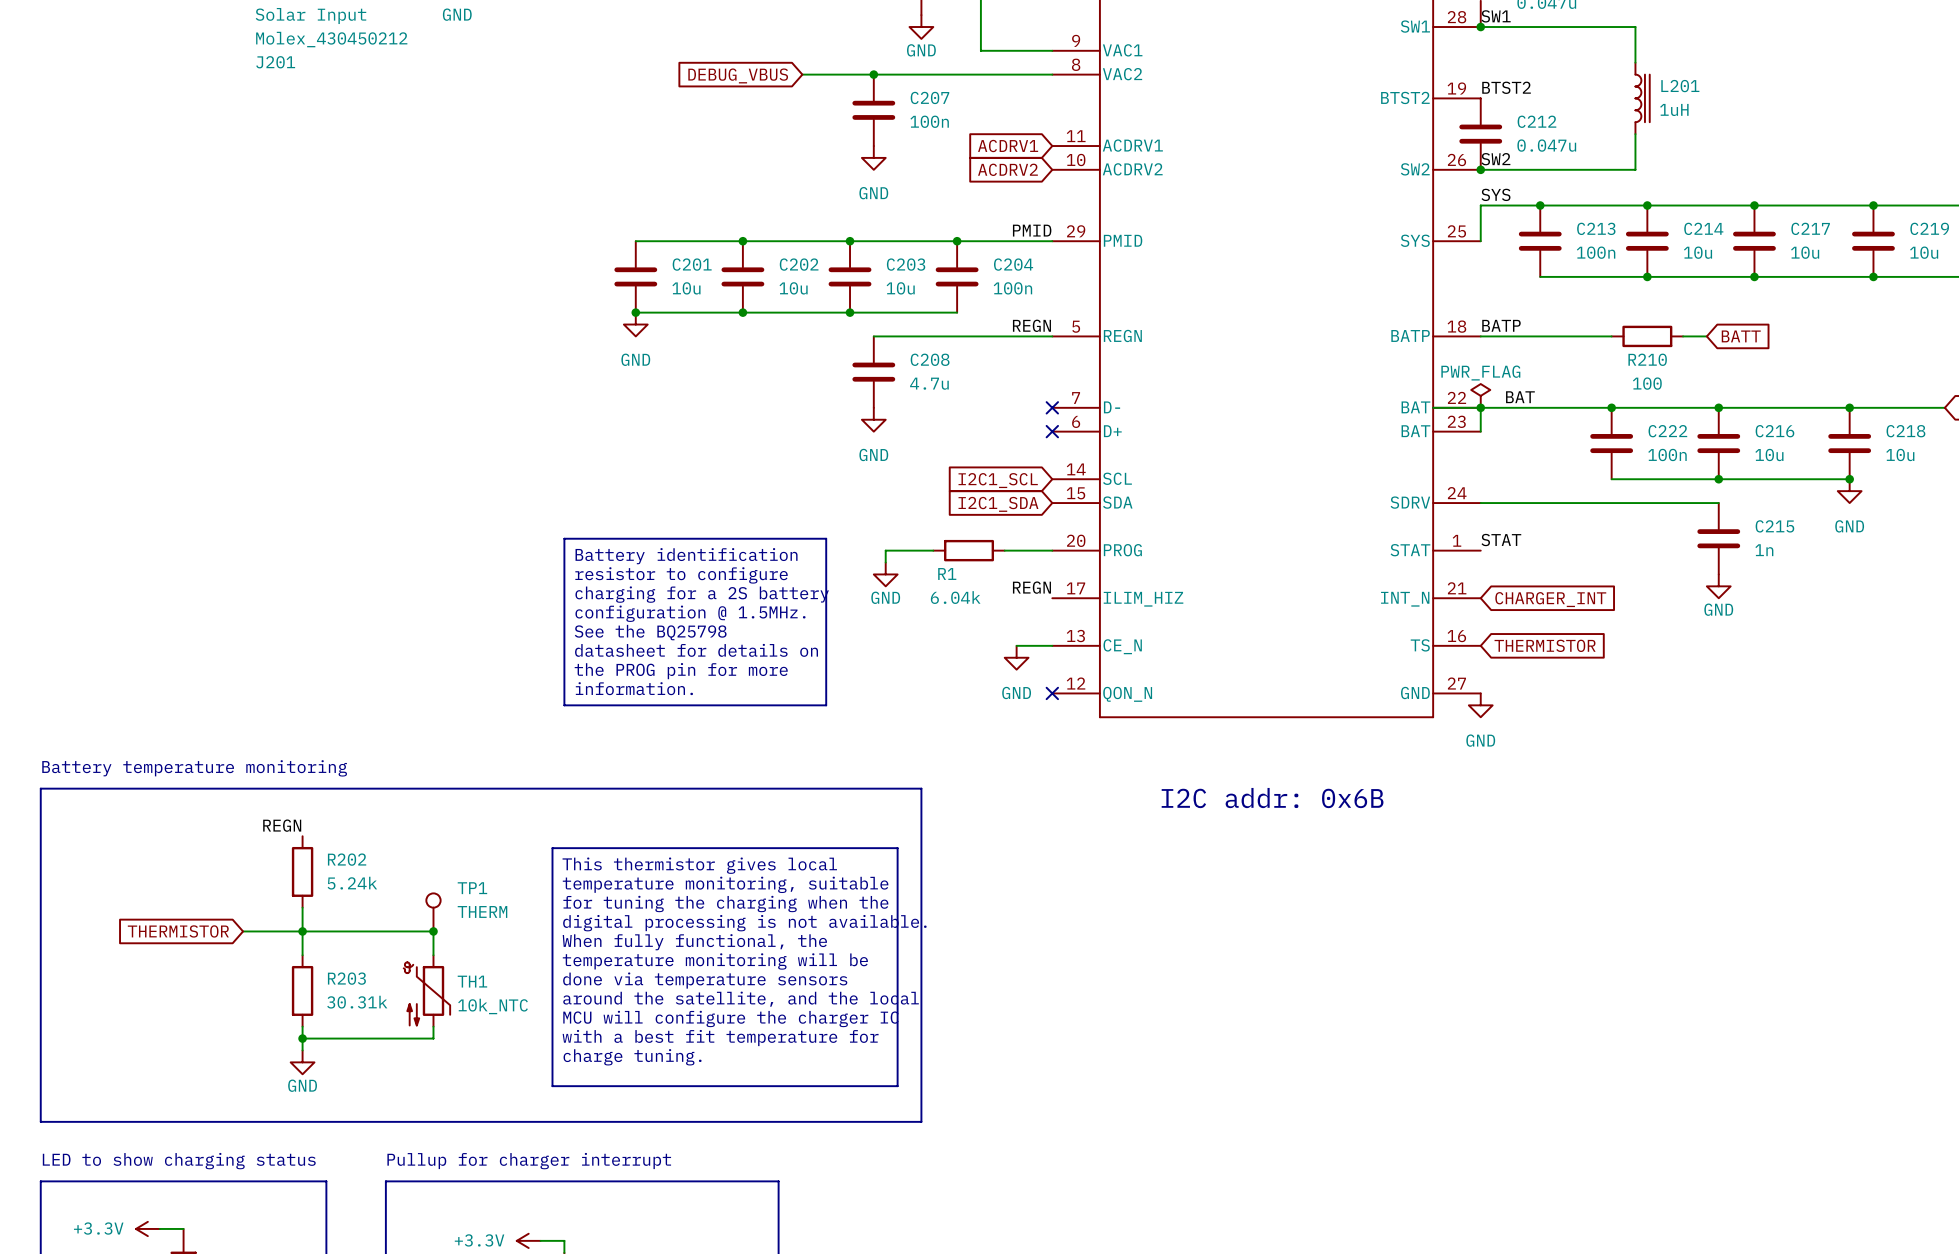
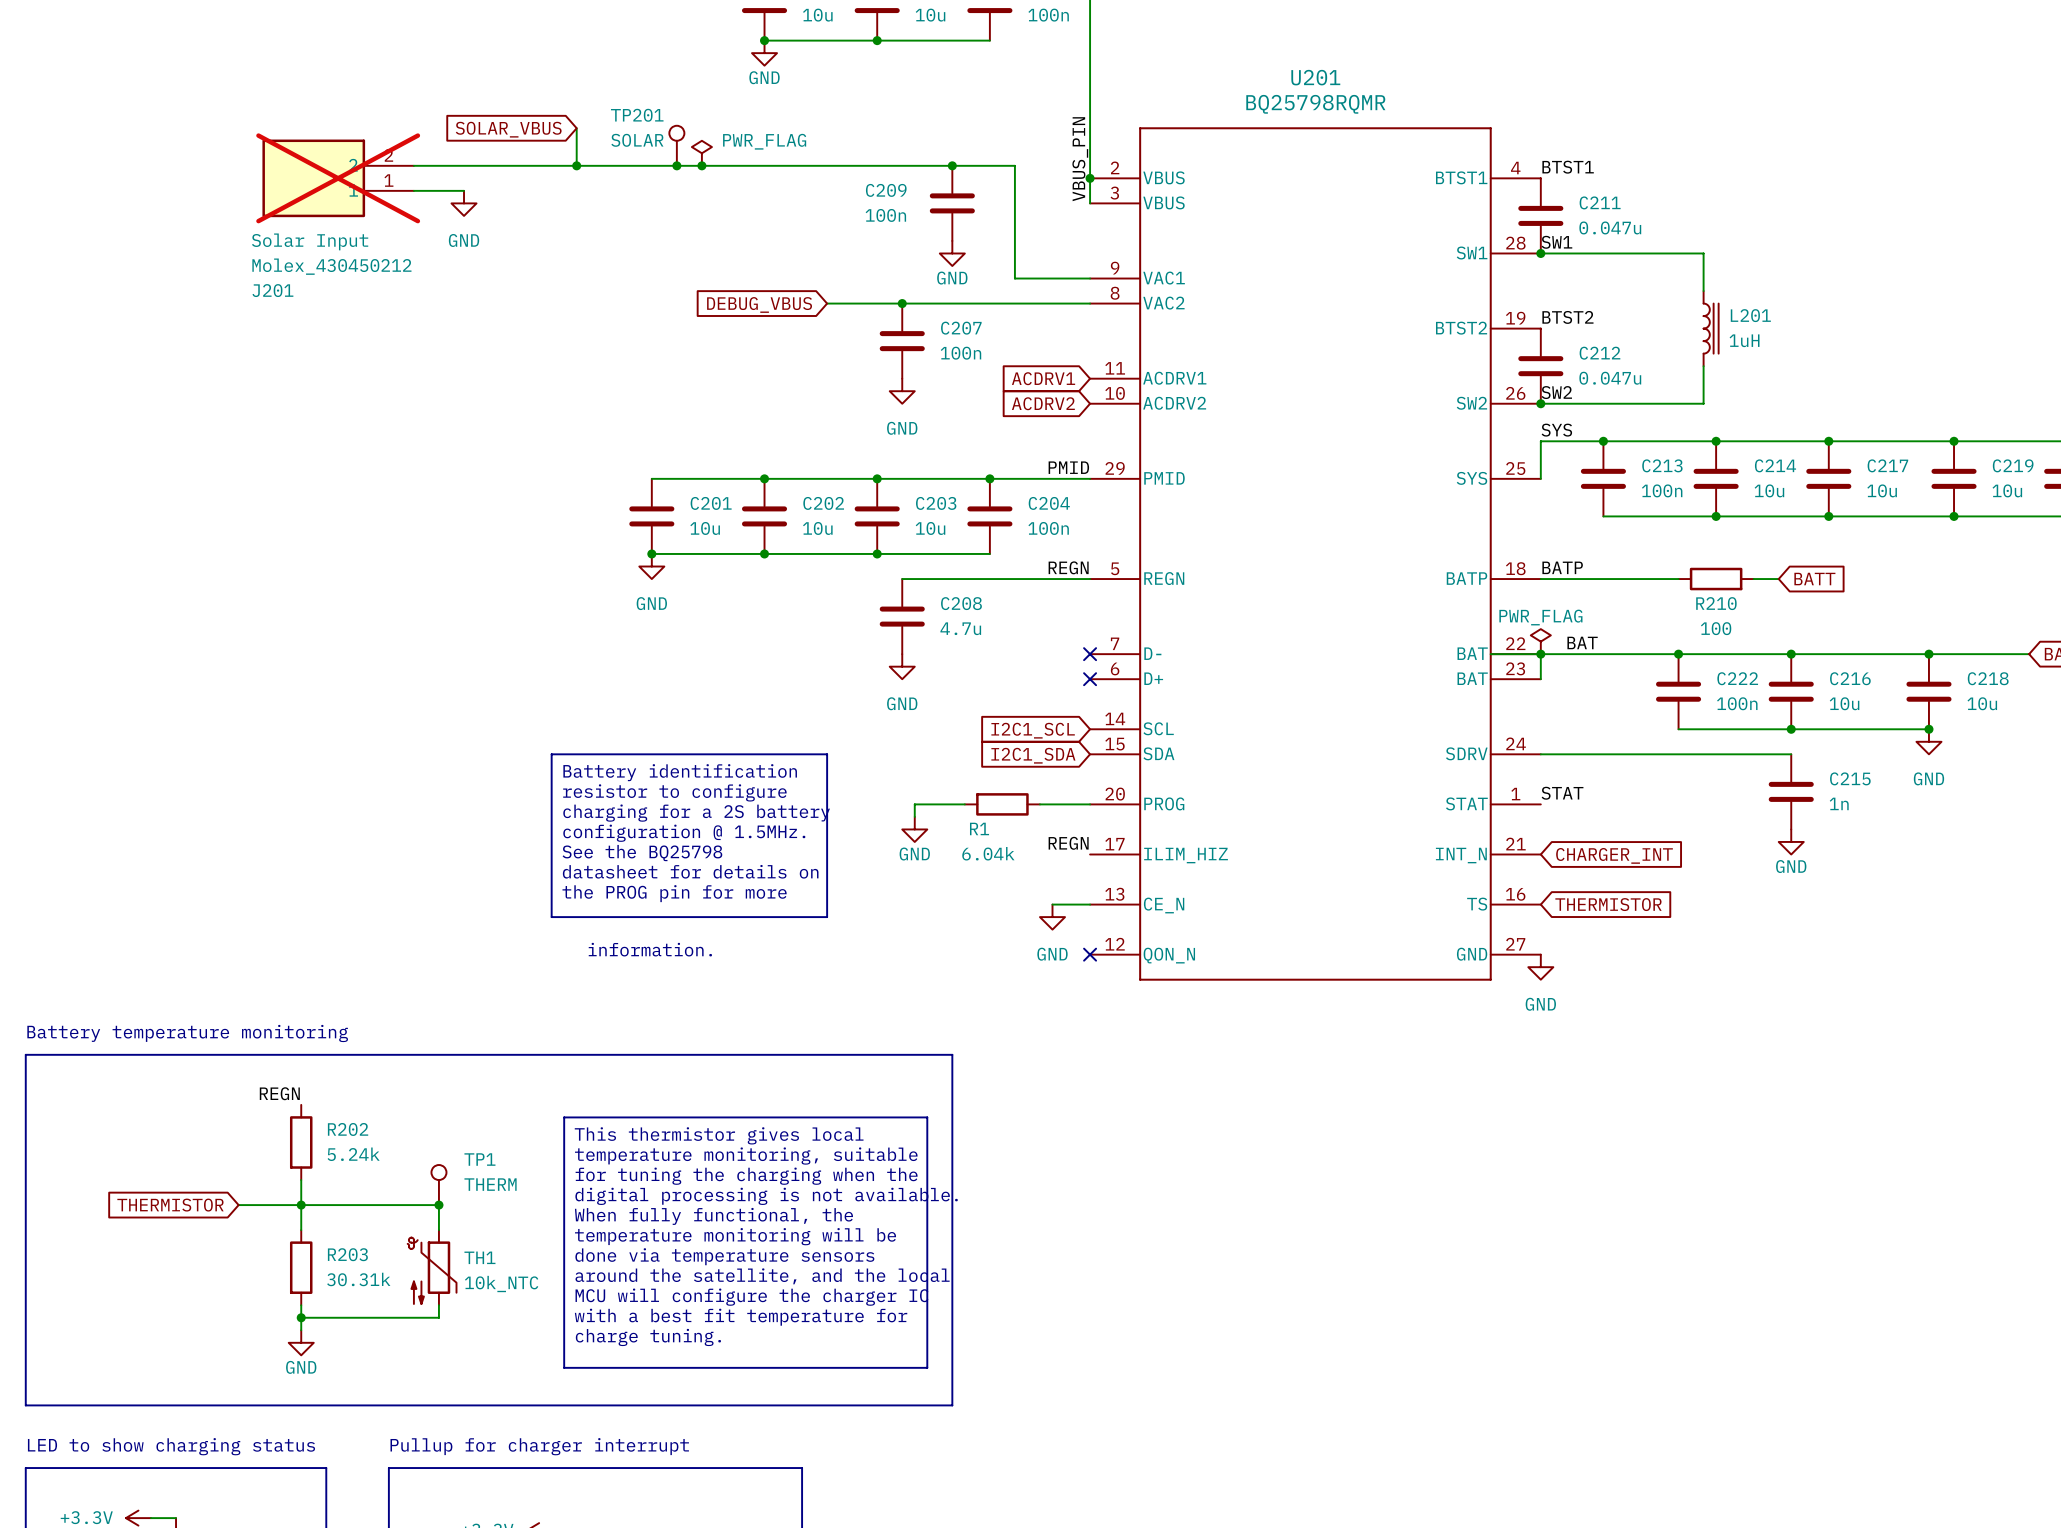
line: (564, 538) (826, 538) (826, 705) (564, 705) (564, 538) -> (551, 754) (551, 917) (827, 917) (827, 754) (551, 754)
text position: Battery identification (686, 556) -> Battery identification (680, 772)
text position: resistor to configure (681, 575) -> resistor to configure (674, 792)
text position: charging for a 2S battery (702, 594) -> charging for a 2S battery (696, 813)
text position: configuration @ 1.5MHz. (690, 613) -> configuration @ 1.5MHz. (684, 833)
text position: See the BQ25798 (650, 632) -> See the BQ25798 (642, 853)
text position: datasheet for details on (696, 650) -> datasheet for details on (690, 871)
text position: the PROG pin for more (681, 671) -> the PROG pin for more (674, 893)
text: I2C addr: 0x6B (1272, 798) -> none

